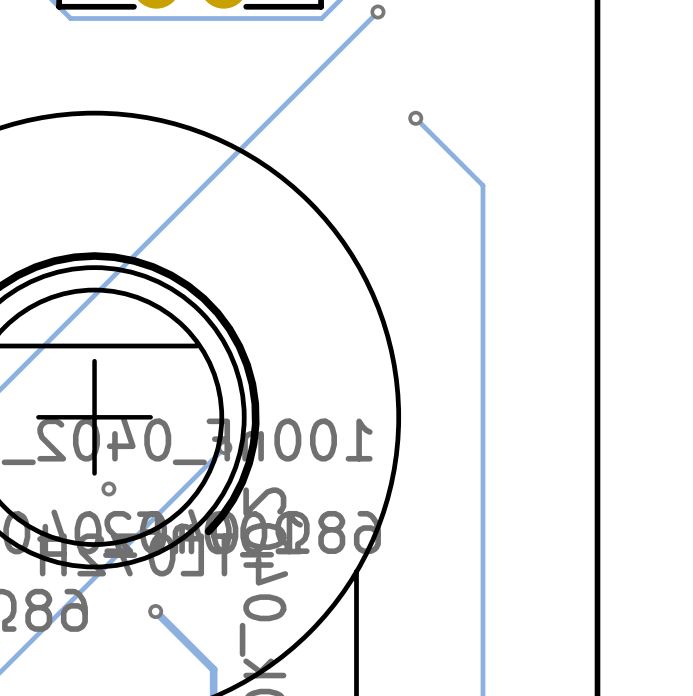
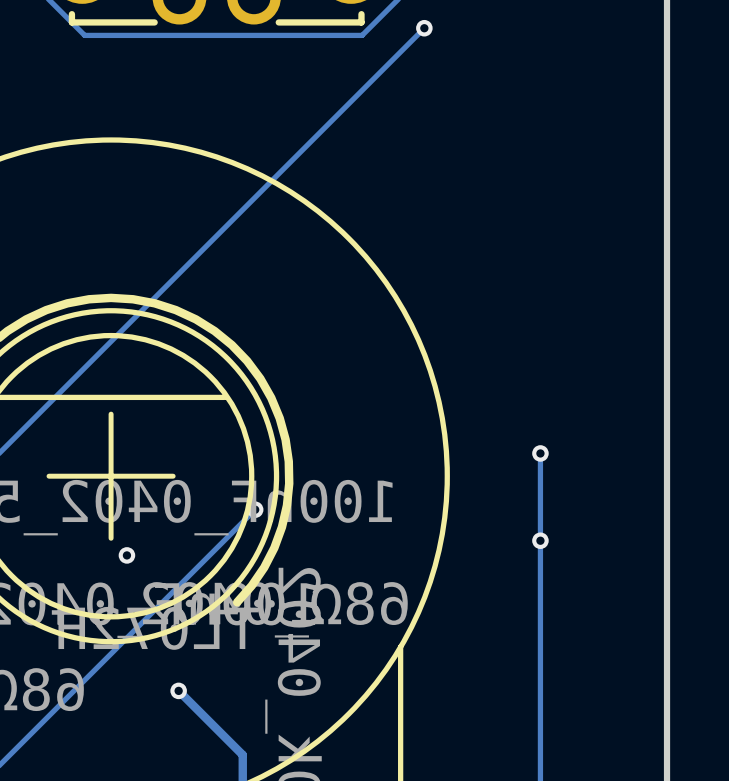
track: (415, 118) (482, 185) (482, 396) -> none
via: (415, 118) -> none
via: none -> (540, 453)
via: none -> (540, 540)

